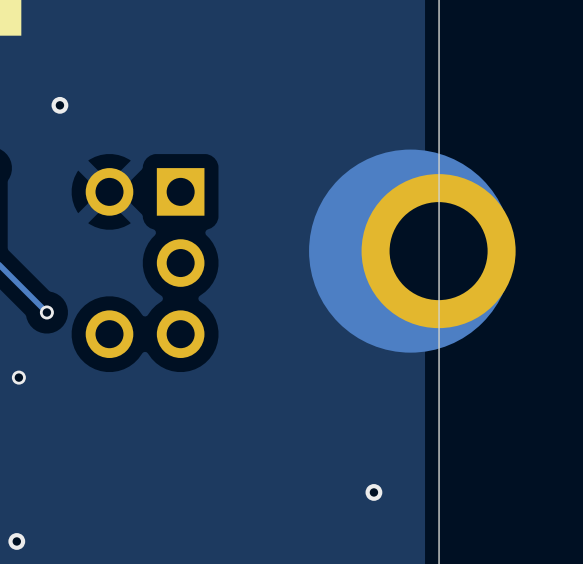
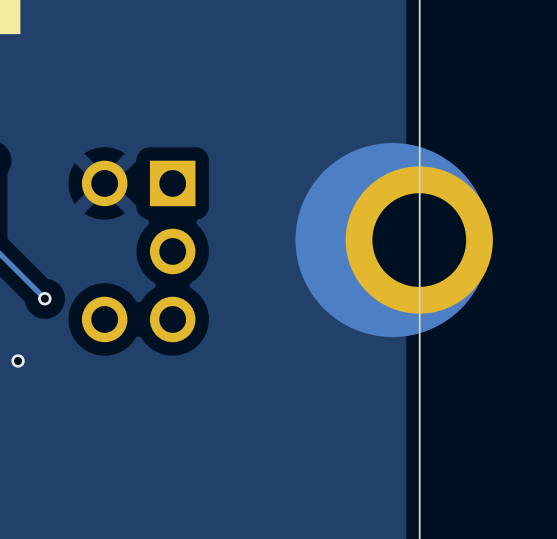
via: (59, 105) -> none
via: (373, 492) -> none
via: (16, 541) -> none

